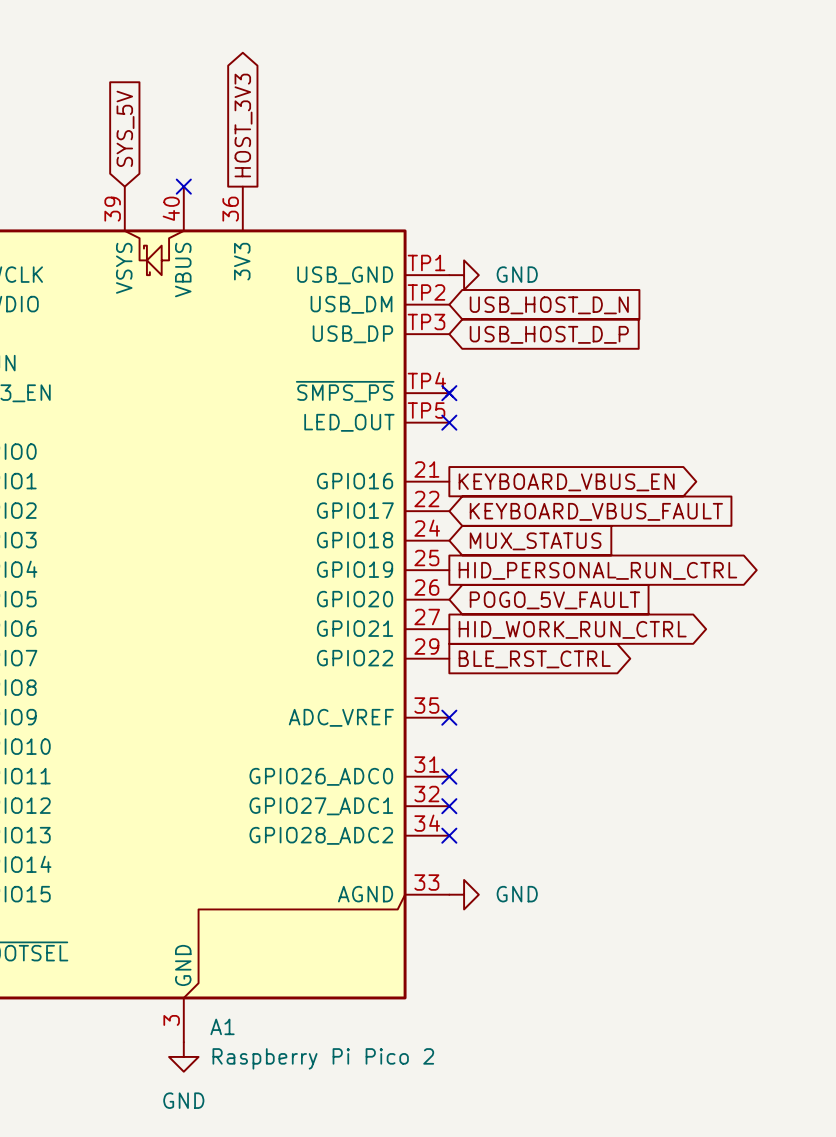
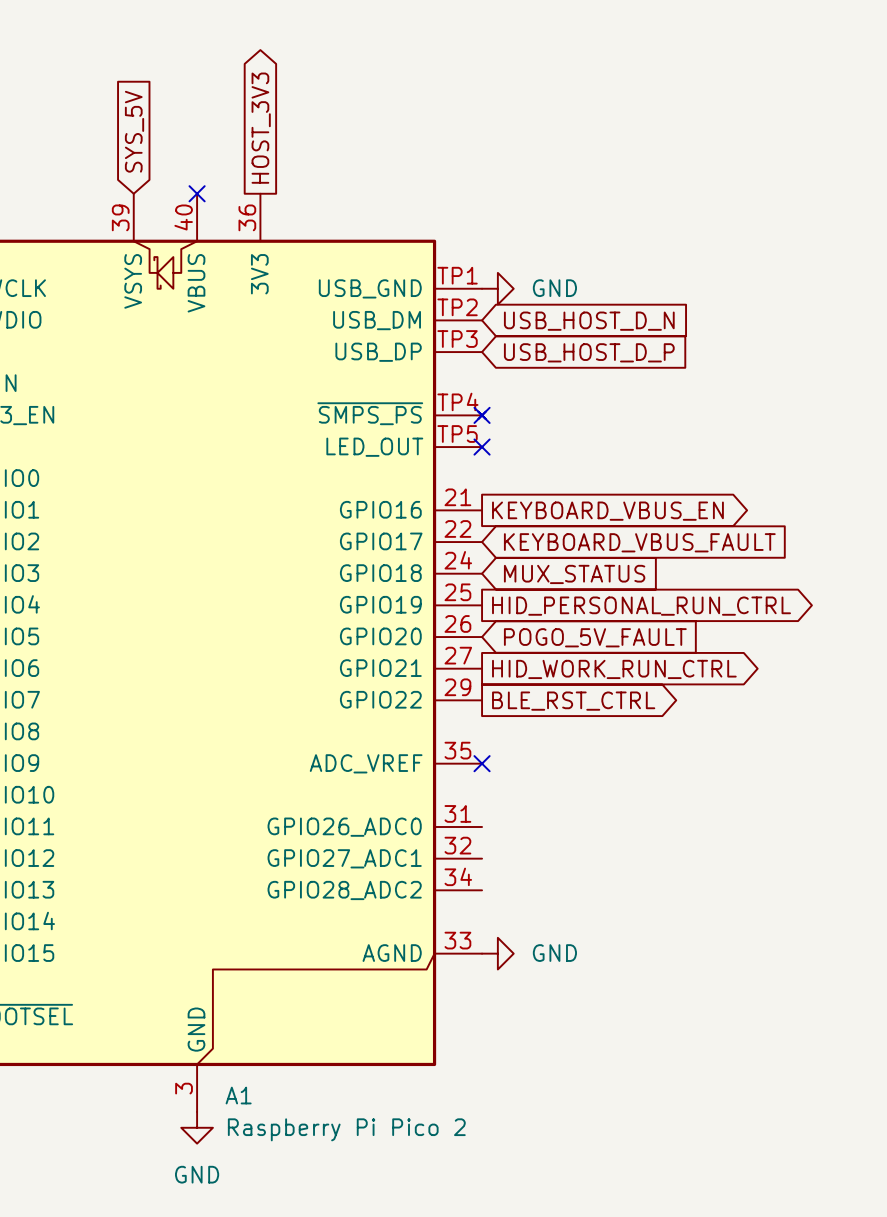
no-connect mark: (449, 776) -> none
no-connect mark: (449, 806) -> none
no-connect mark: (449, 835) -> none

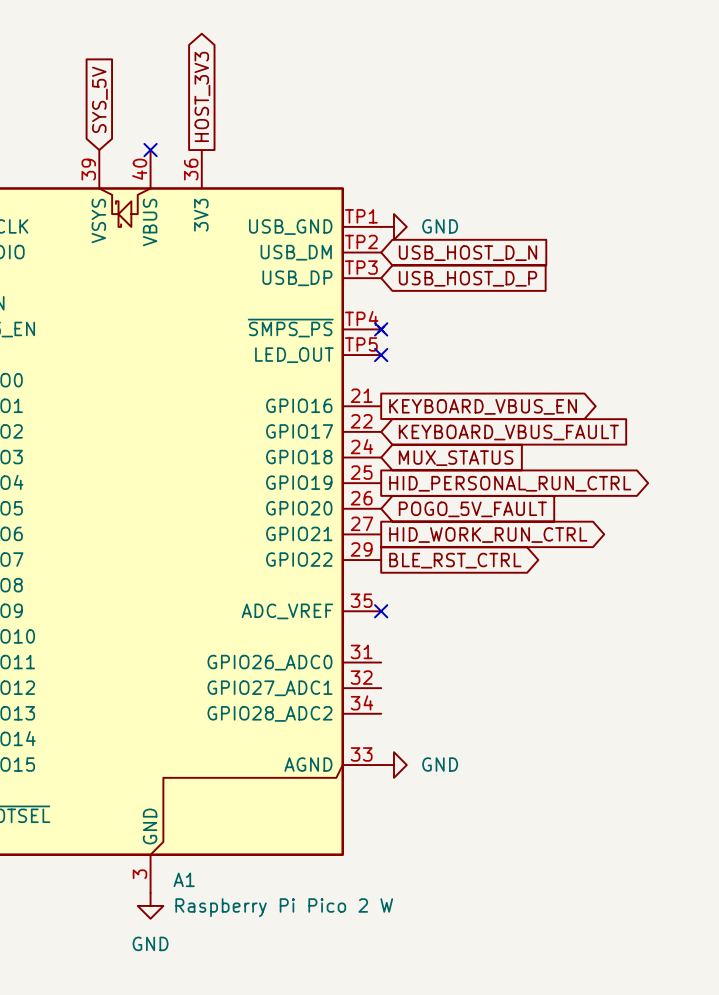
A1 value: Raspberry Pi Pico 2 (346, 1129) -> Raspberry Pi Pico 2 W (284, 907)

